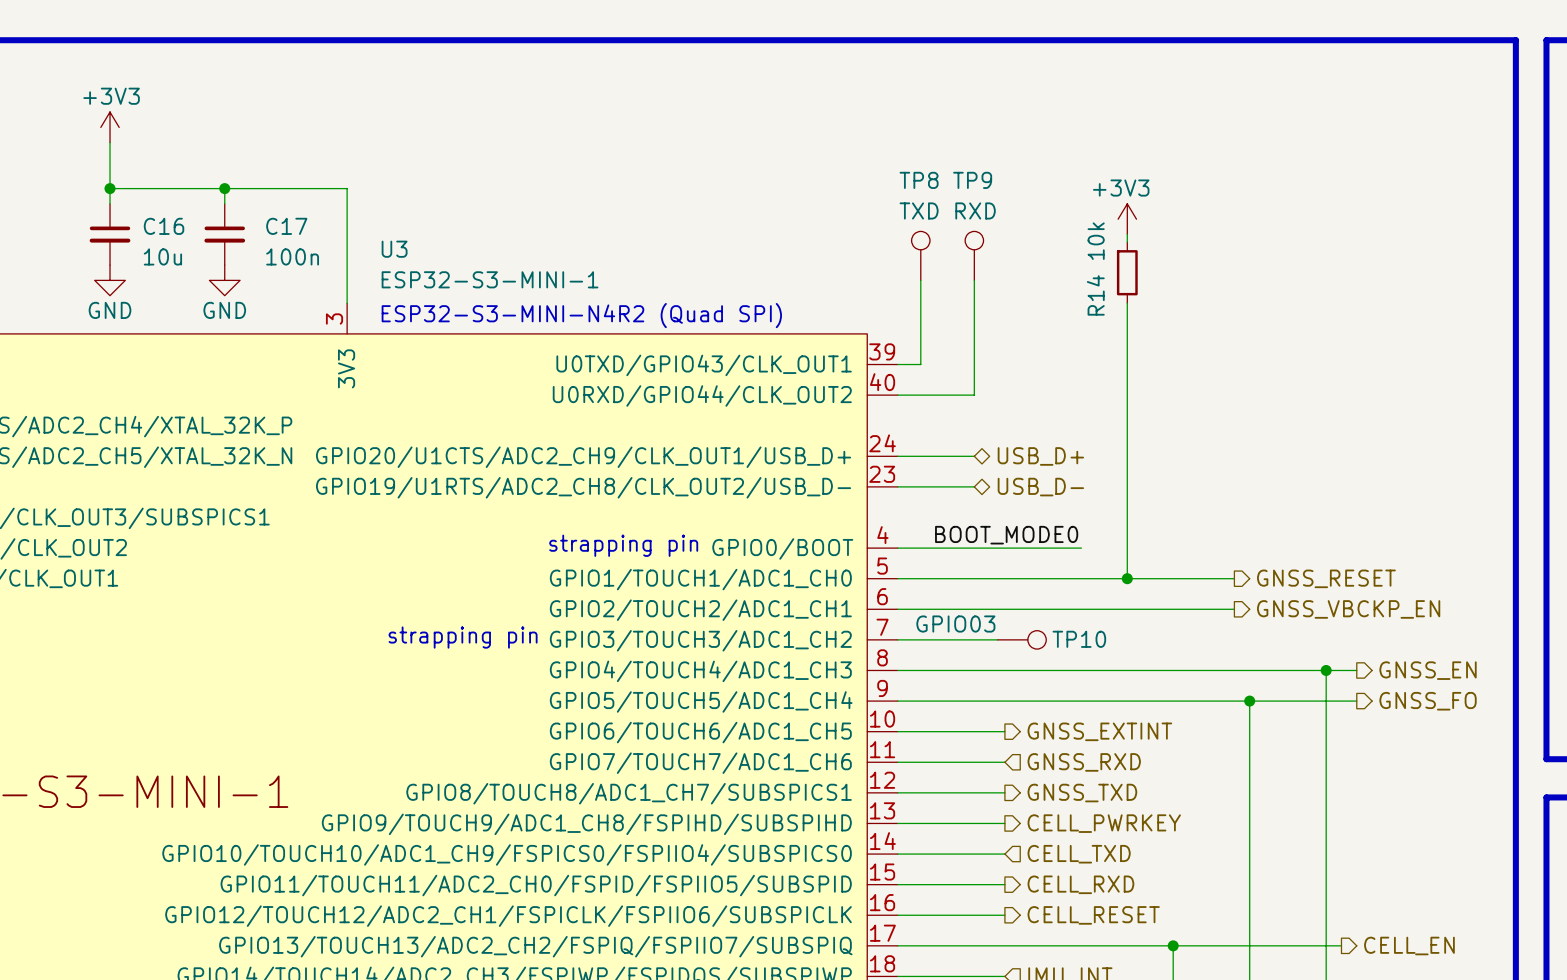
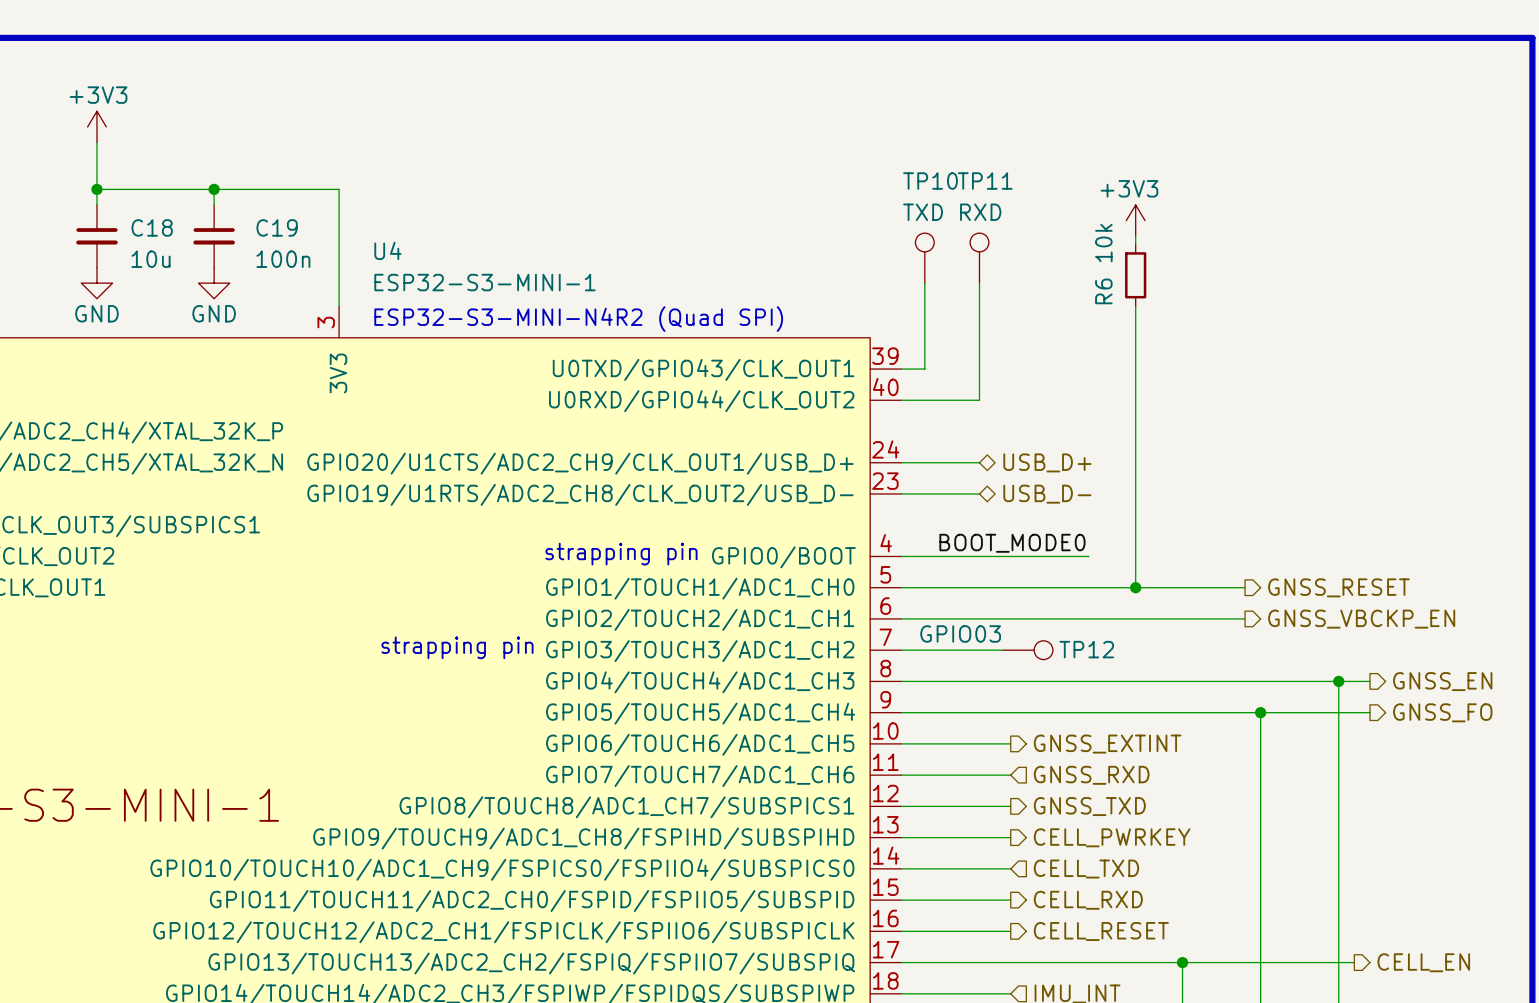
TP8 name: TP8 (919, 180) -> TP10 (930, 181)
TP9 name: TP9 (972, 180) -> TP11 (985, 181)
C16 name: C16 (164, 226) -> C18 (152, 227)
C17 name: C17 (286, 226) -> C19 (277, 227)
U3 name: U3 (394, 249) -> U4 (387, 250)
R14 name: R14 (1095, 295) -> R6 (1103, 291)
TP10 name: TP10 (1079, 639) -> TP12 (1086, 649)

